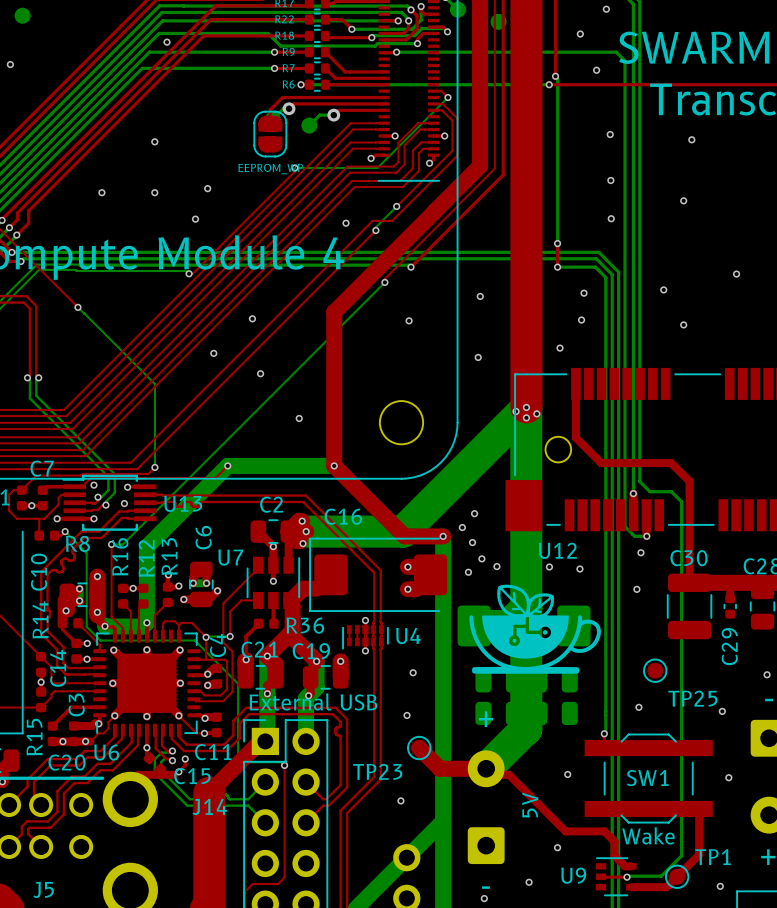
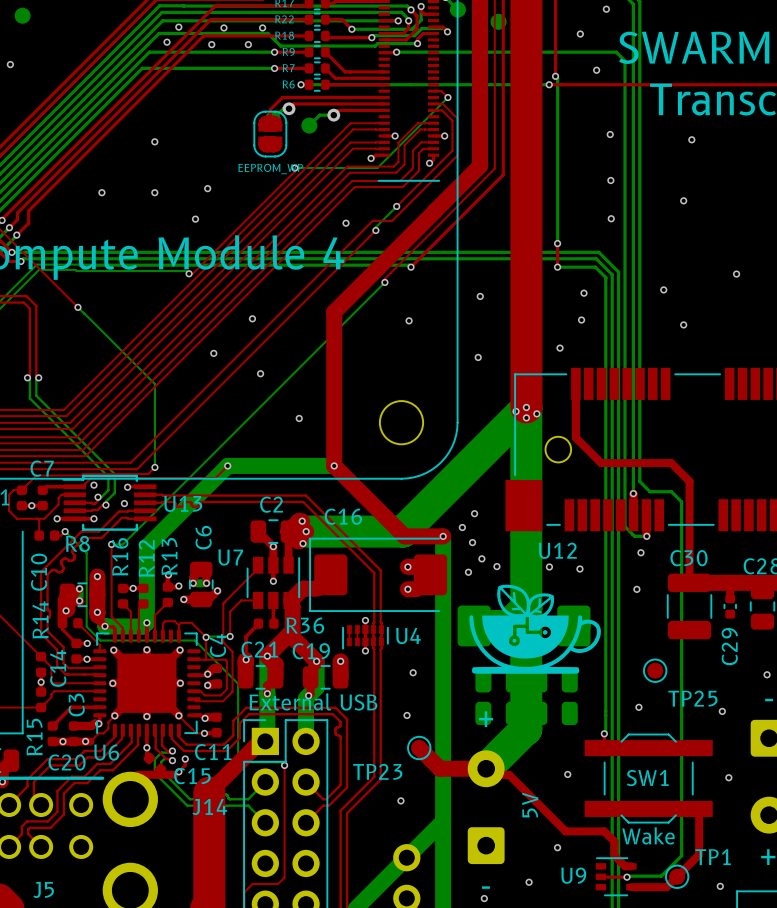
via: none -> (178, 27)
via: none -> (223, 27)
via: none -> (262, 27)
via: none -> (211, 44)
via: none -> (248, 44)

